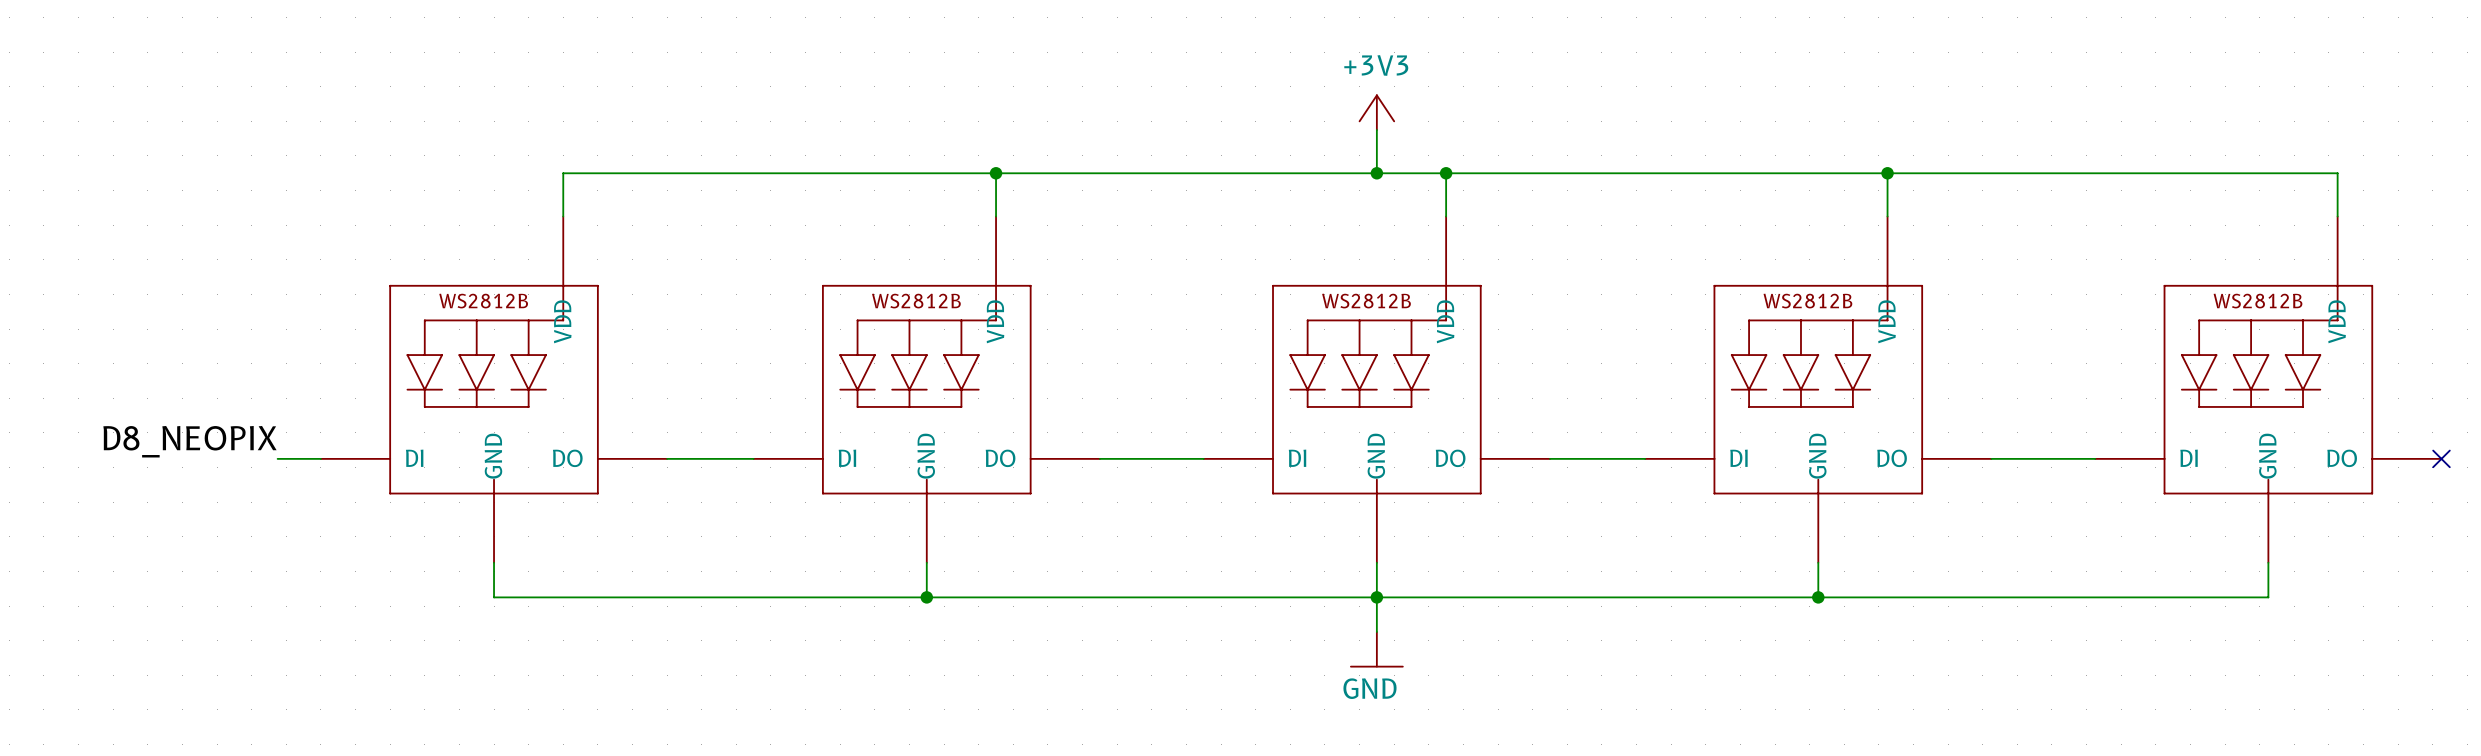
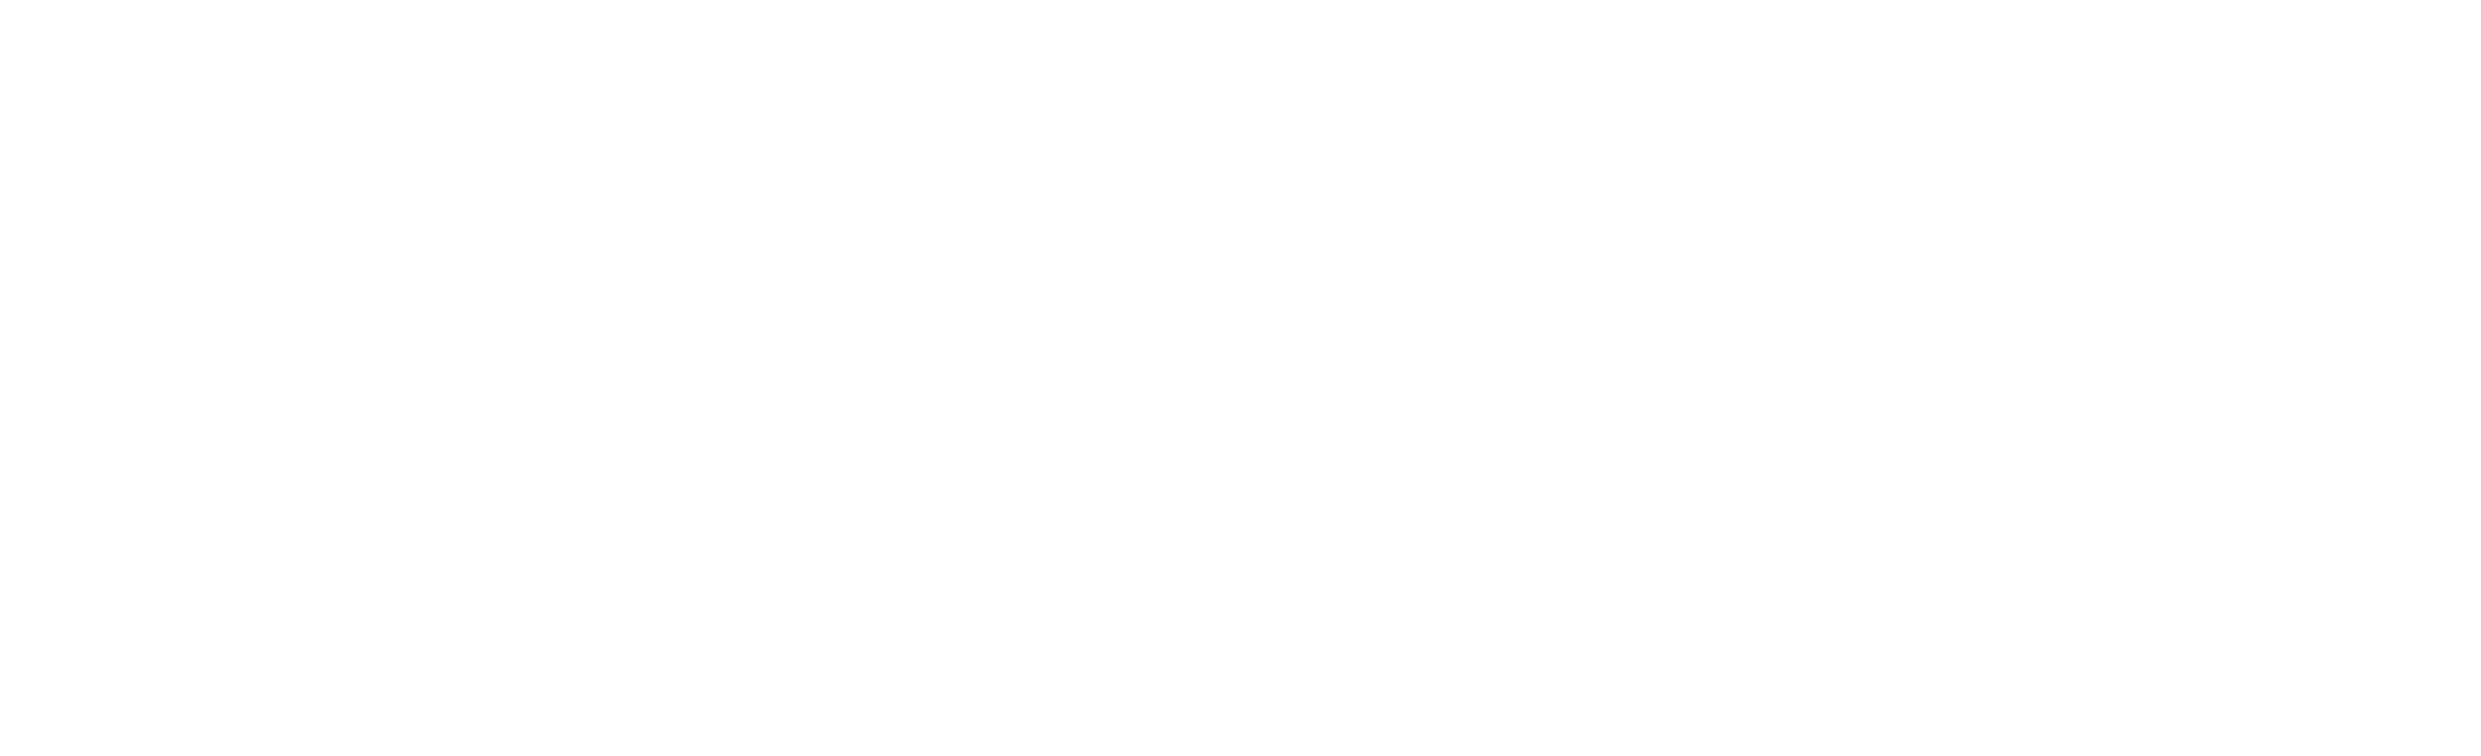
power symbol: +3V3 (1376, 112) -> none
wire: (1376, 130) (1376, 173) -> none
wire: (996, 173) (996, 216) -> none
junction: (996, 173) -> none
junction: (1376, 173) -> none
wire: (1446, 173) (1446, 216) -> none
junction: (1446, 173) -> none
wire: (1887, 173) (1887, 216) -> none
junction: (1887, 173) -> none
wire: (563, 216) (563, 173) (2337, 173) (2337, 216) -> none
part: (494, 389) -> none
part: (926, 389) -> none
part: (1376, 389) -> none
part: (1818, 389) -> none
part: (2268, 389) -> none
label: D8_NEOPIX (189, 441) -> none
wire: (277, 458) (320, 458) -> none
wire: (667, 458) (753, 458) -> none
wire: (1099, 458) (1203, 458) -> none
wire: (1549, 458) (1645, 458) -> none
wire: (1991, 458) (2095, 458) -> none
no-connect mark: (2441, 458) -> none
wire: (494, 562) (494, 597) (2268, 597) (2268, 562) -> none
wire: (926, 562) (926, 597) -> none
wire: (1376, 562) (1376, 632) -> none
wire: (1818, 562) (1818, 597) -> none
junction: (926, 597) -> none
junction: (1376, 597) -> none
junction: (1818, 597) -> none
power symbol: GND (1376, 649) -> none

